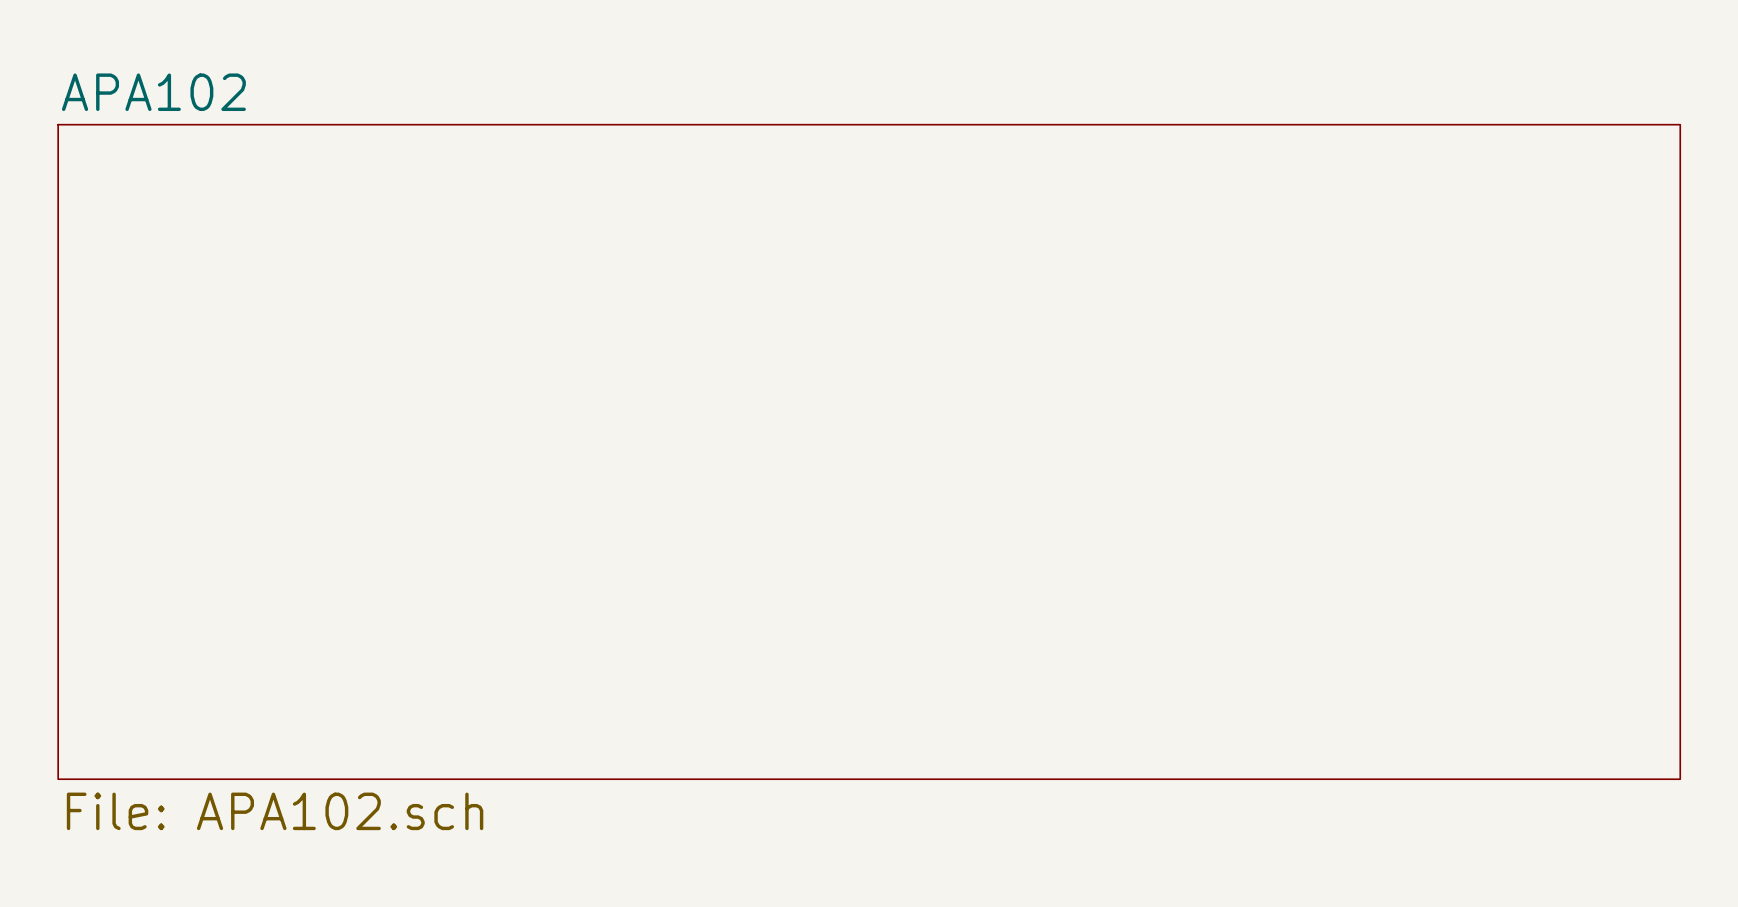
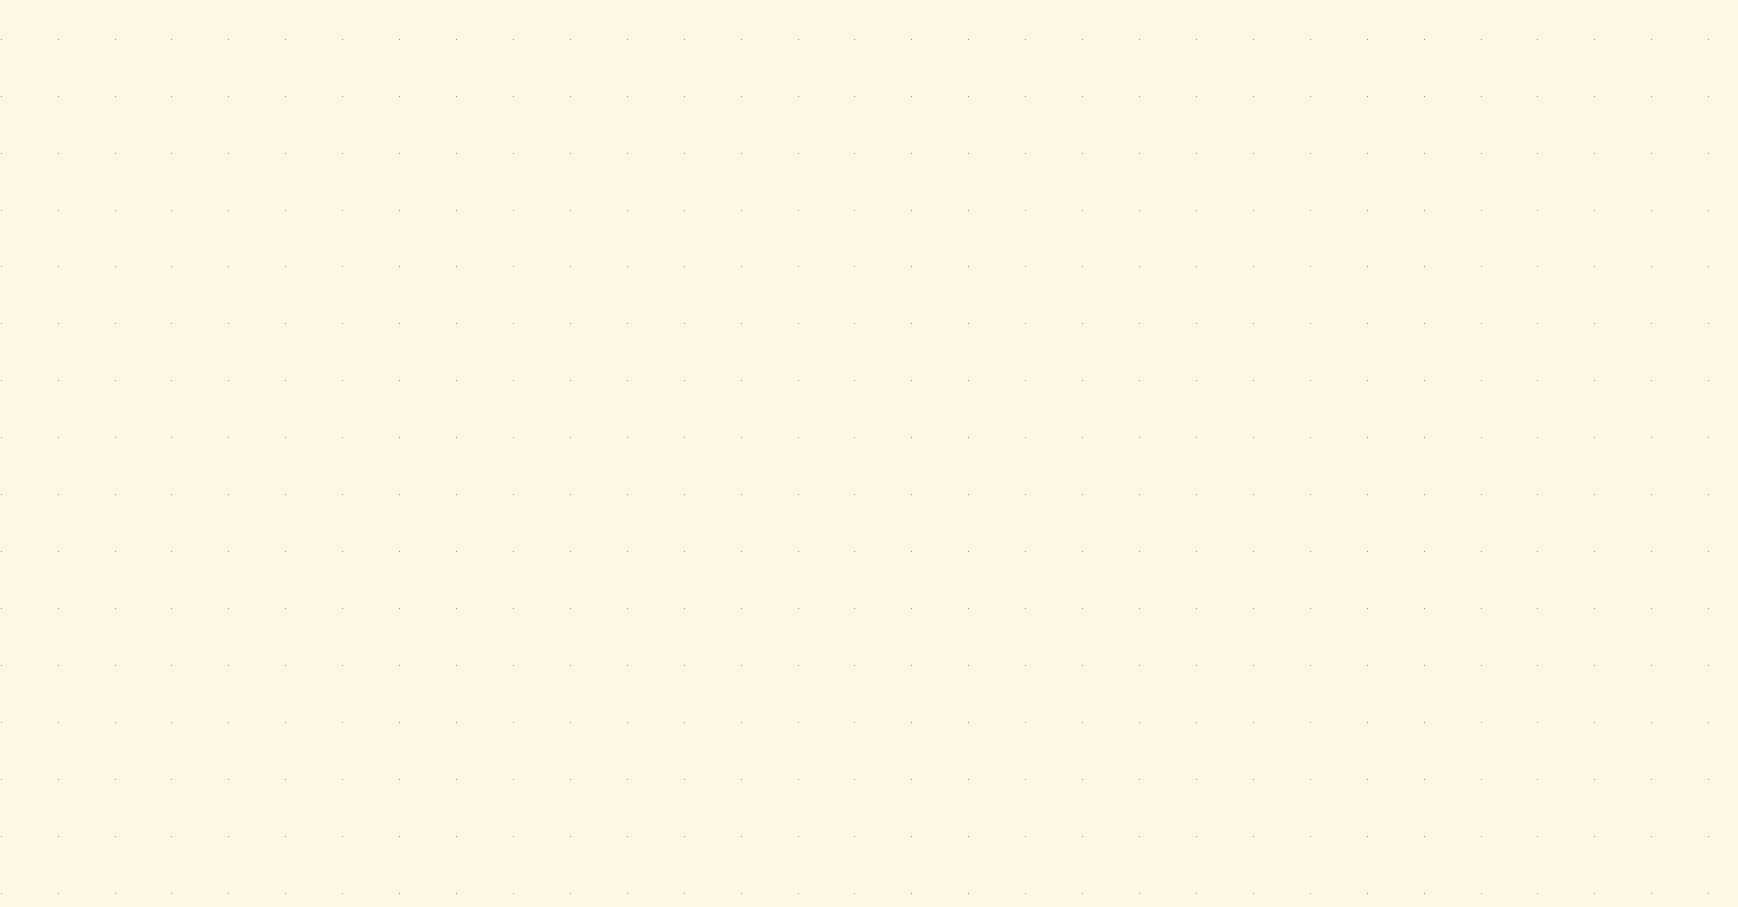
sheet APA102: File: APA102.sch (869, 451) -> none

